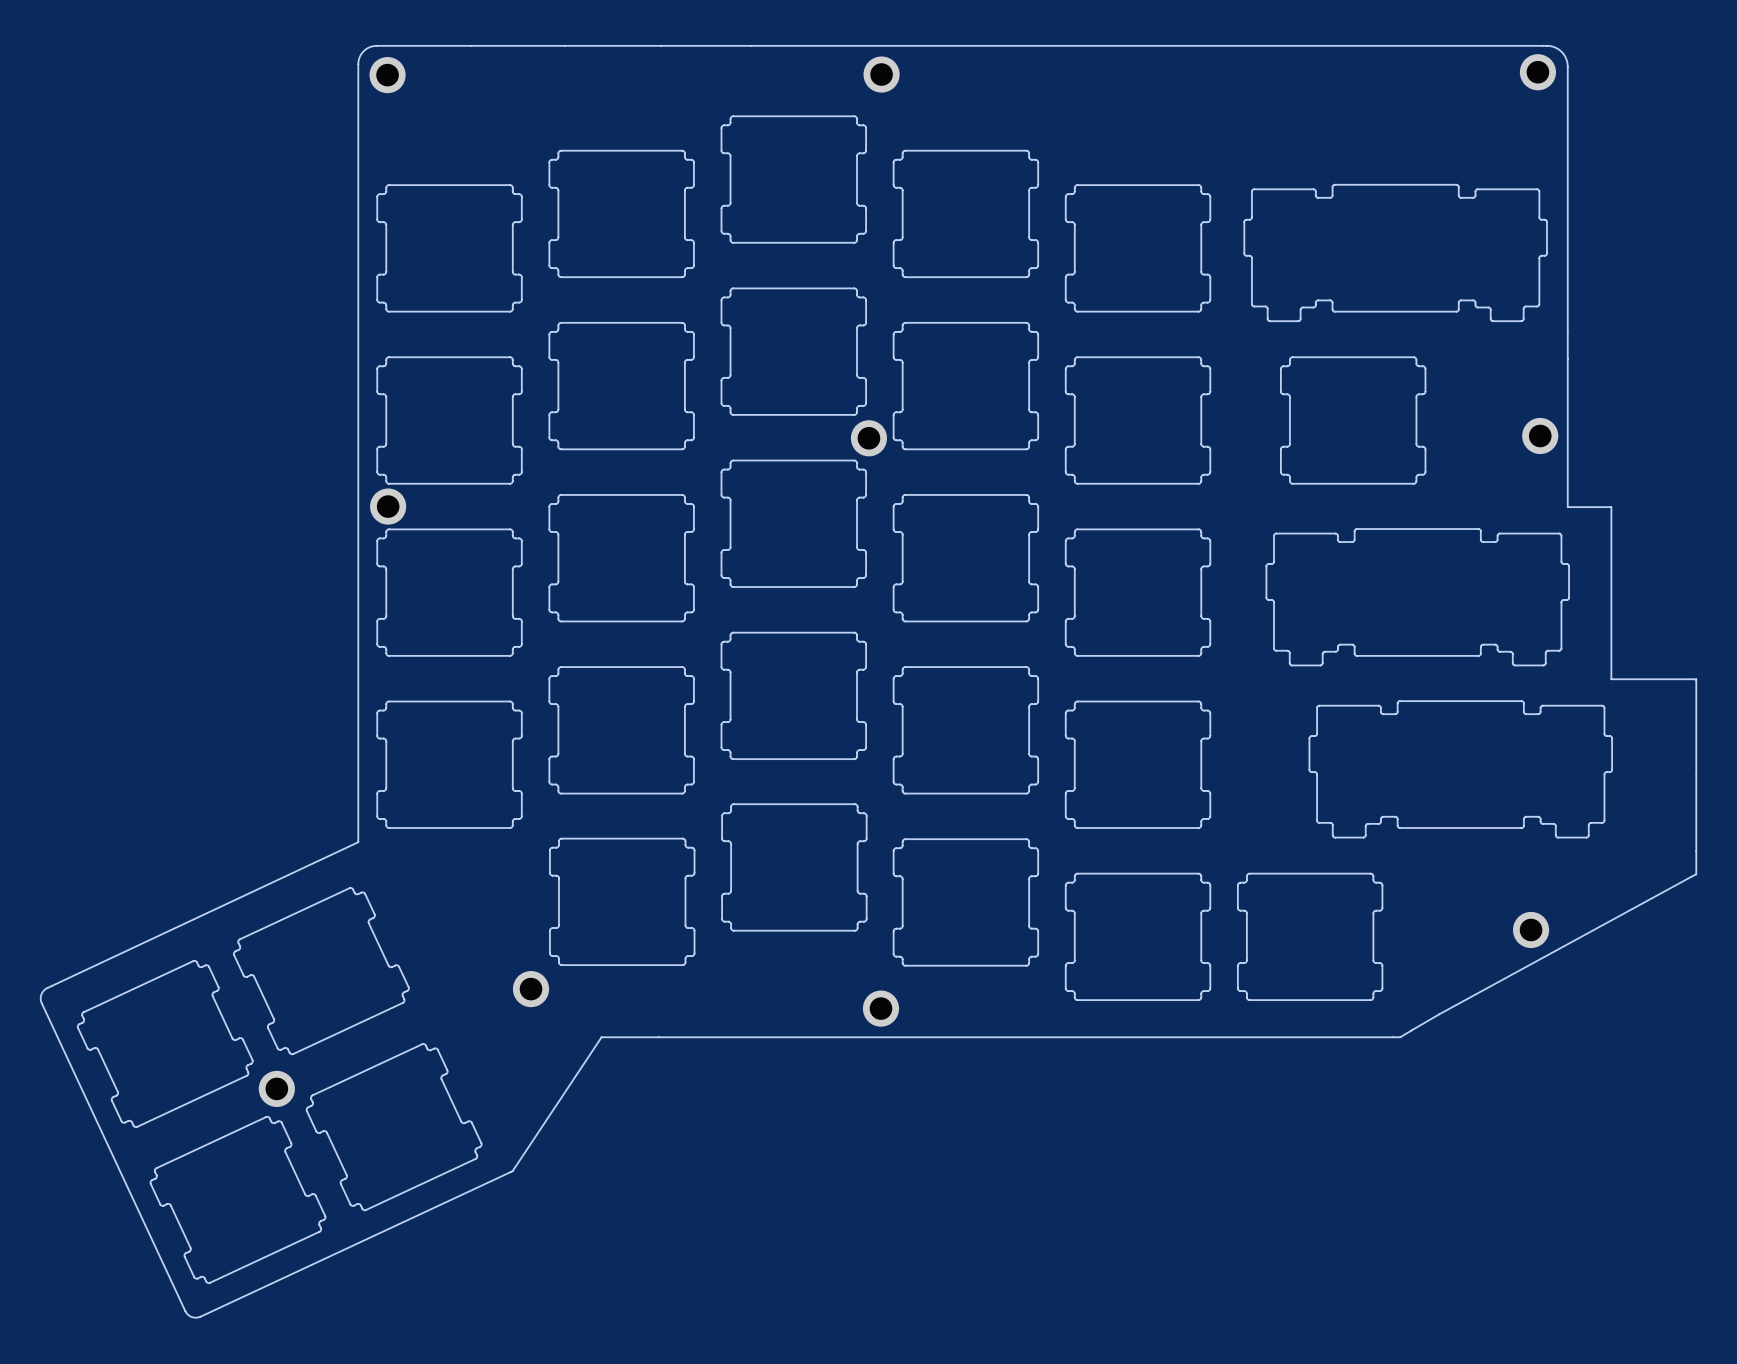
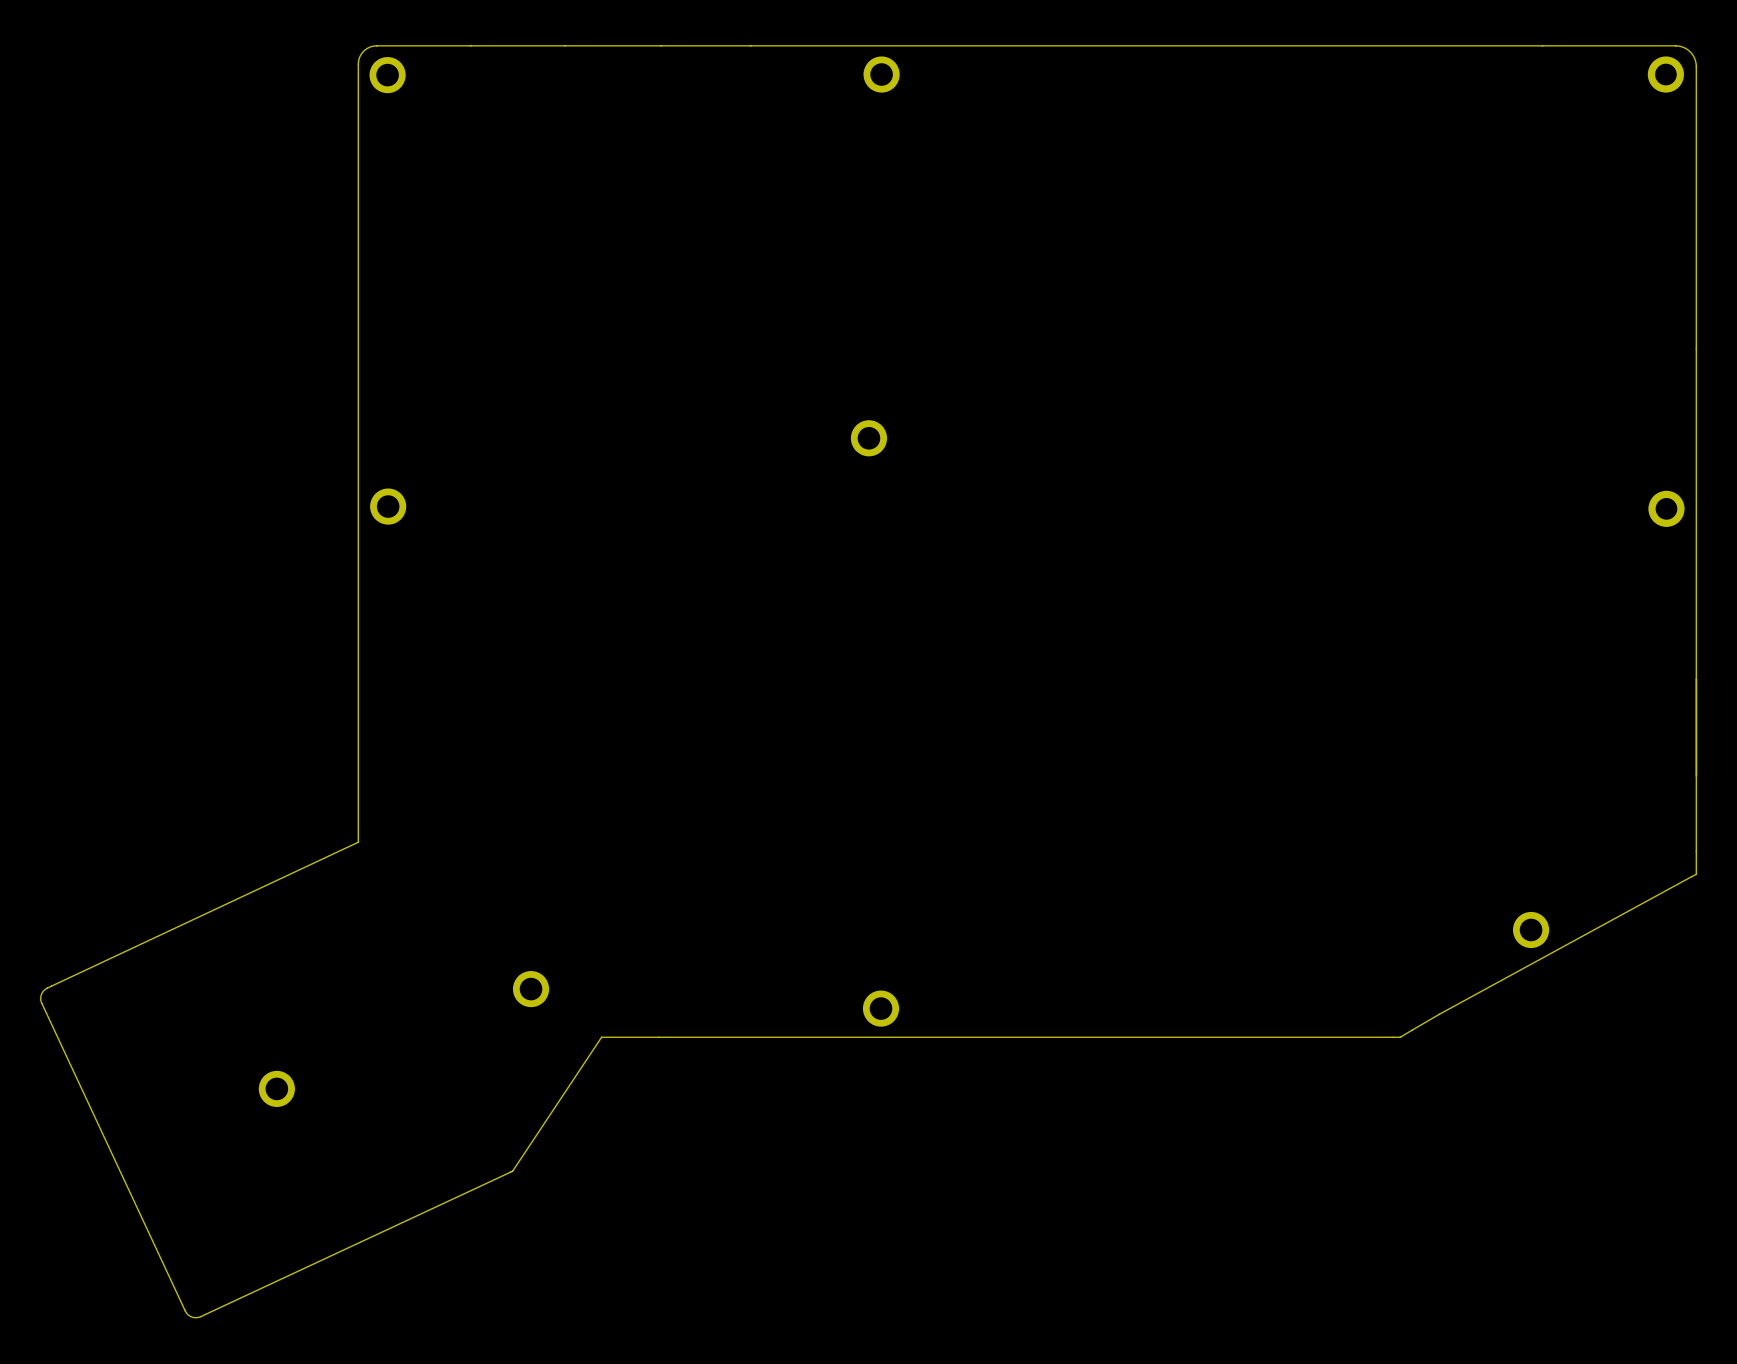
board edge: (1547, 45) (1554, 47) (1561, 51) (1566, 58) (1567, 66) (1567, 507) (1611, 507) (1611, 679) (1696, 679) -> (1547, 45) (1678, 46) (1690, 51) (1695, 61) (1696, 679)
part: (1537, 72) -> none
part: none -> (1665, 74)
drawing: [721, 115, 867, 244] -> none
drawing: [548, 150, 695, 278] -> none
drawing: [893, 150, 1039, 278] -> none
drawing: [376, 184, 523, 313] -> none
drawing: [1065, 184, 1211, 313] -> none
drawing: [1243, 184, 1548, 322] -> none
drawing: [721, 287, 867, 416] -> none
drawing: [548, 322, 695, 450] -> none
drawing: [893, 322, 1039, 450] -> none
drawing: [376, 356, 523, 485] -> none
drawing: [1065, 356, 1211, 485] -> none
drawing: [1280, 356, 1426, 485] -> none
part: (1540, 435) -> none
drawing: [721, 460, 867, 588] -> none
drawing: [548, 494, 695, 622] -> none
drawing: [893, 494, 1039, 622] -> none
part: none -> (1666, 508)
drawing: [376, 528, 523, 657] -> none
drawing: [1065, 528, 1211, 657] -> none
drawing: [1265, 528, 1570, 666] -> none
drawing: [721, 632, 867, 760] -> none
drawing: [548, 666, 695, 795] -> none
drawing: [893, 666, 1039, 795] -> none
drawing: [1308, 700, 1613, 839] -> none
drawing: [376, 701, 523, 829] -> none
drawing: [1065, 701, 1211, 829] -> none
drawing: [721, 803, 868, 932] -> none
drawing: [549, 838, 695, 966] -> none
drawing: [893, 838, 1039, 967] -> none
drawing: [1065, 873, 1211, 1001] -> none
drawing: [1237, 873, 1383, 1001] -> none
drawing: [77, 887, 483, 1284] -> none

